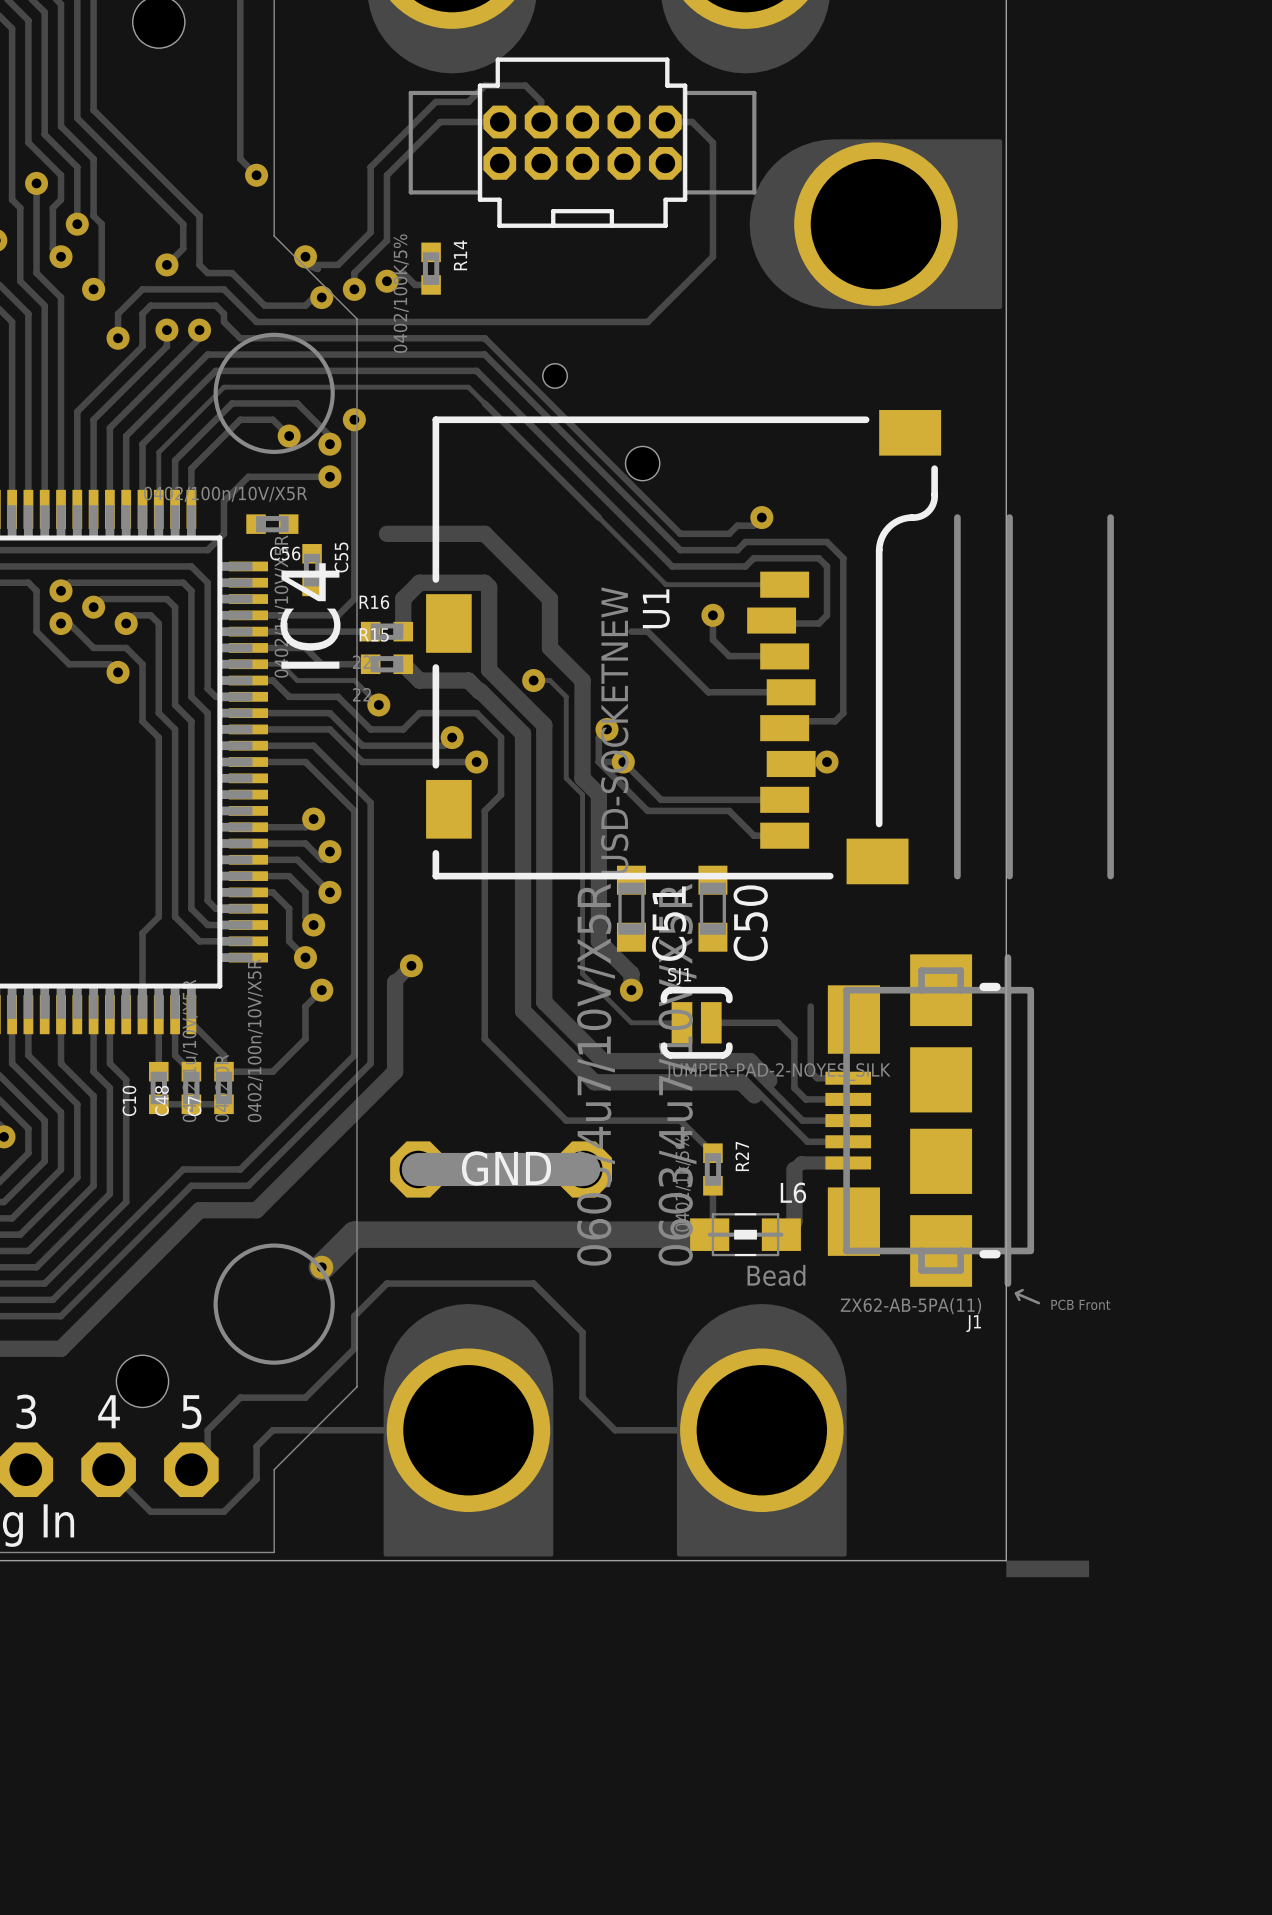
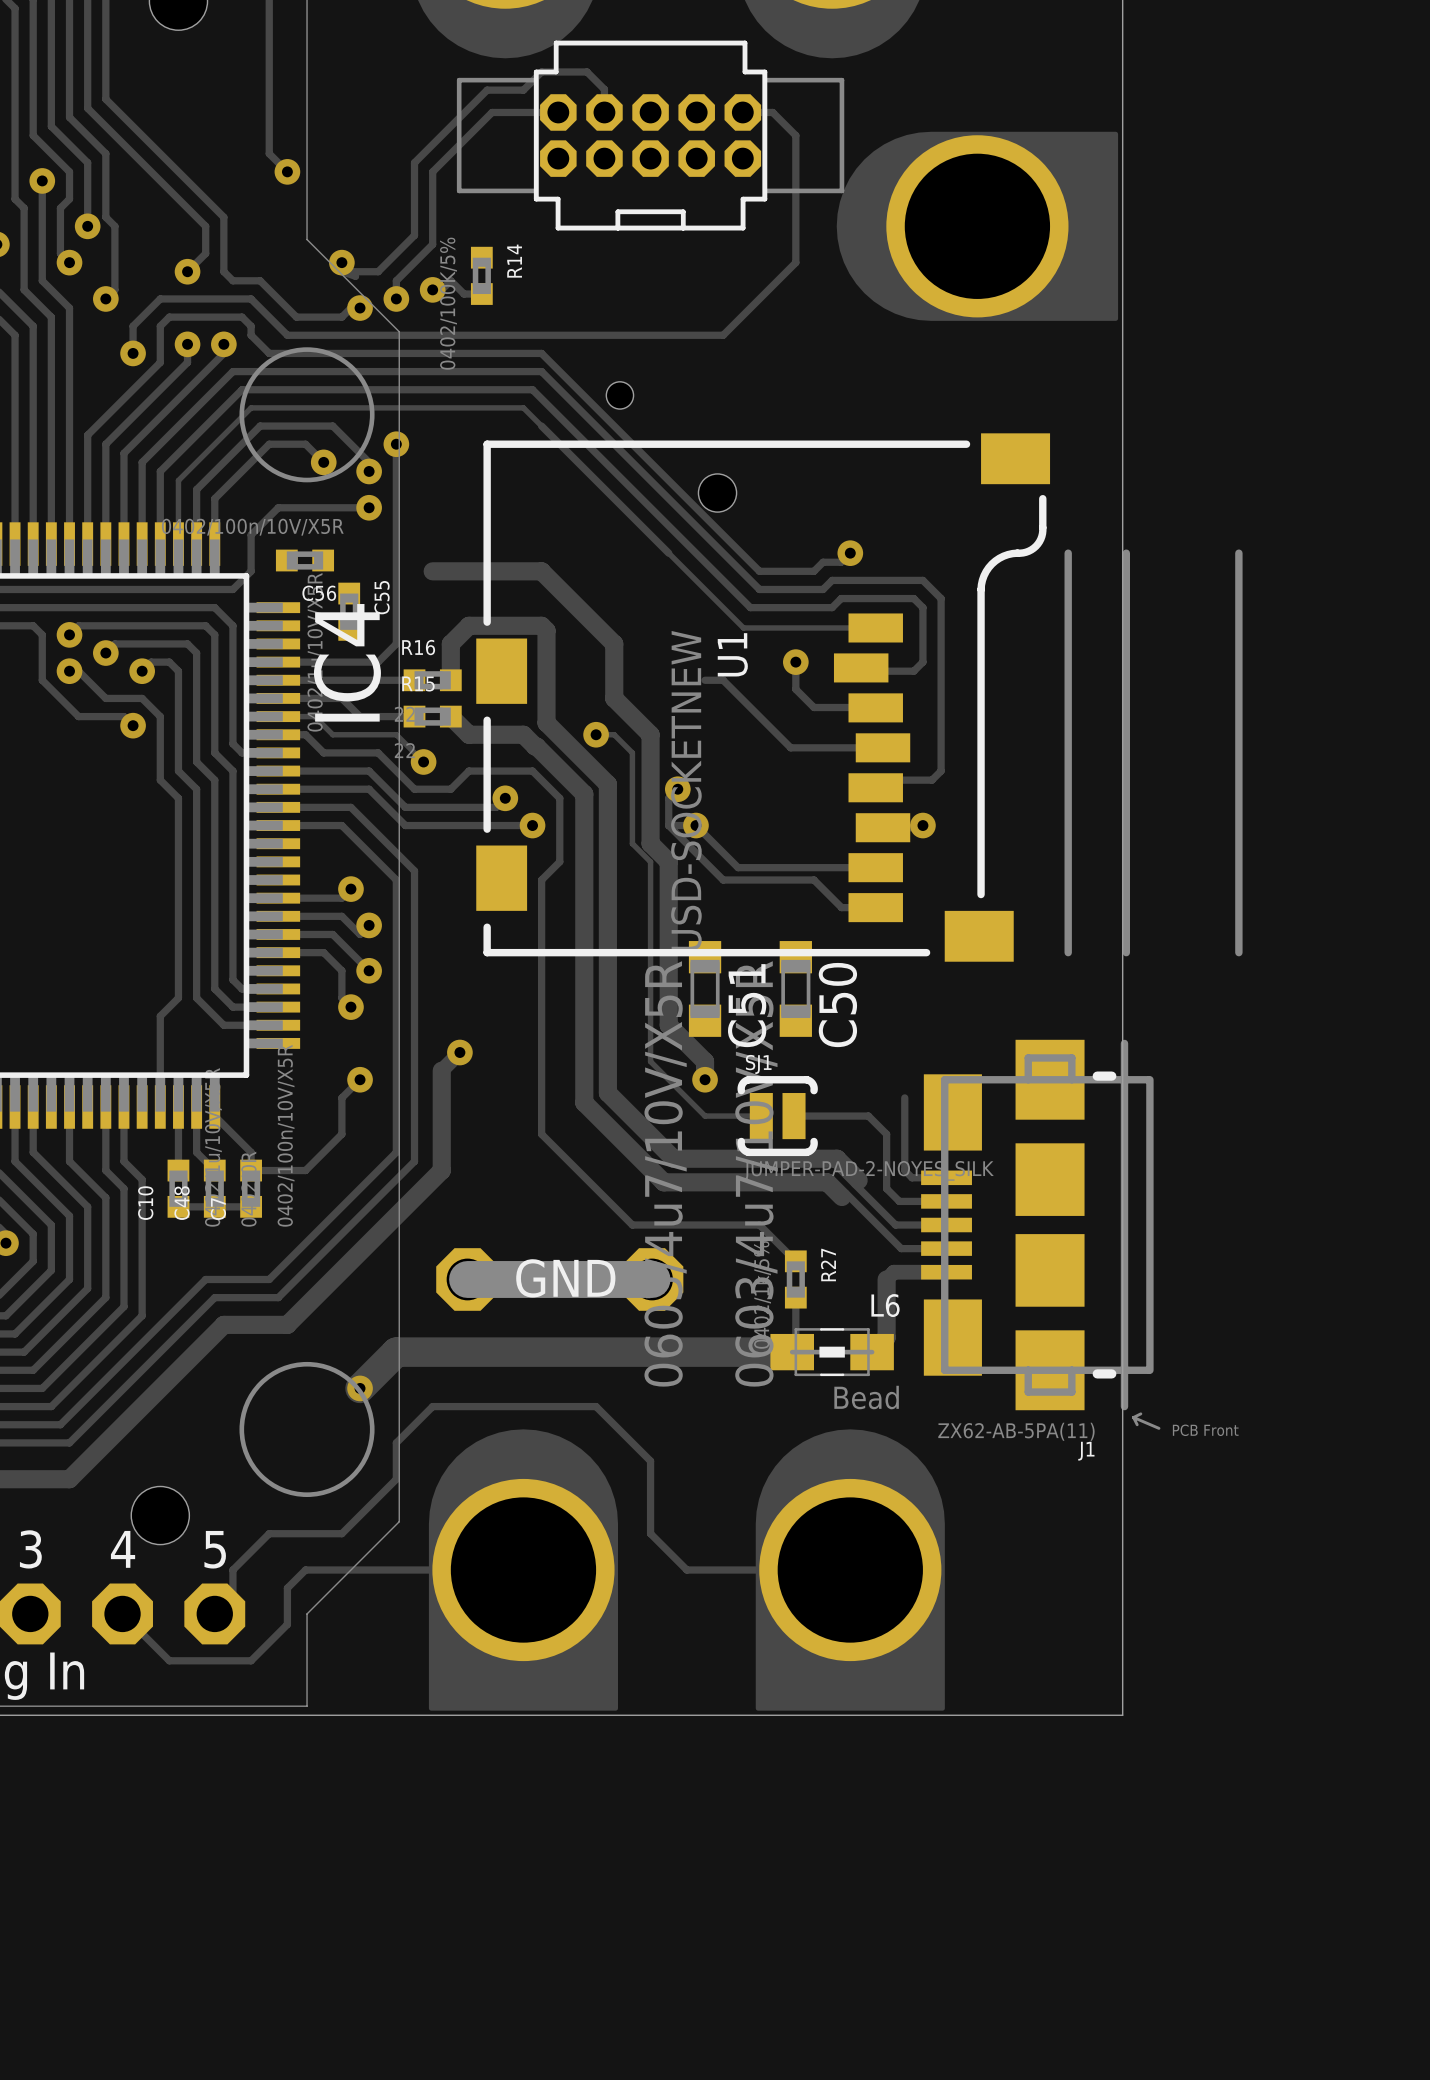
track: (248, 892) (272, 892) (289, 908) (289, 941) (305, 957) -> none
via: (305, 957) -> none
drawing: [1006, 1560, 1090, 1578] -> none

